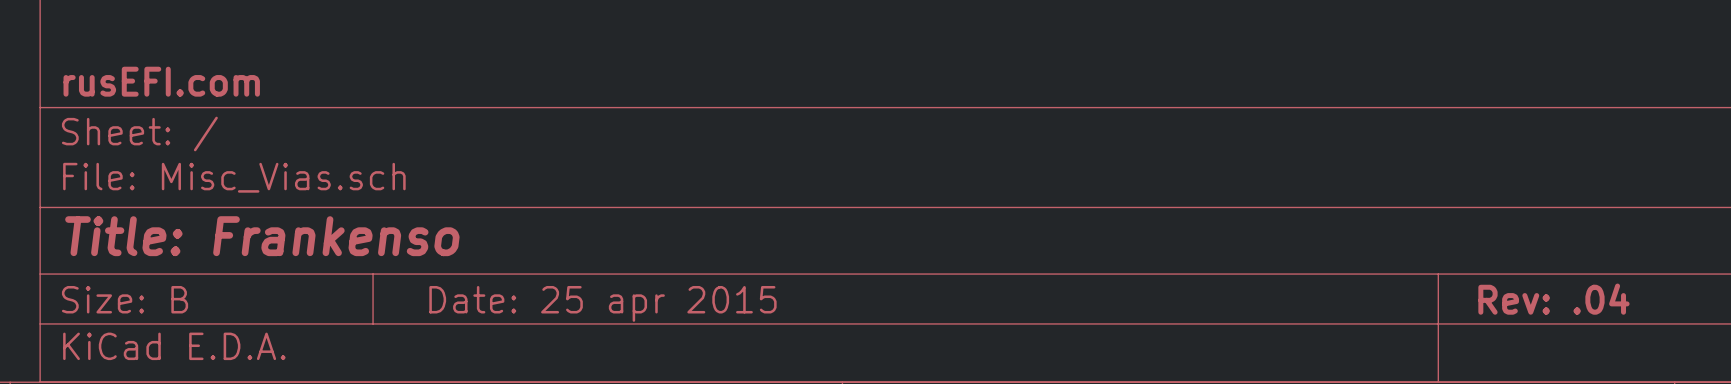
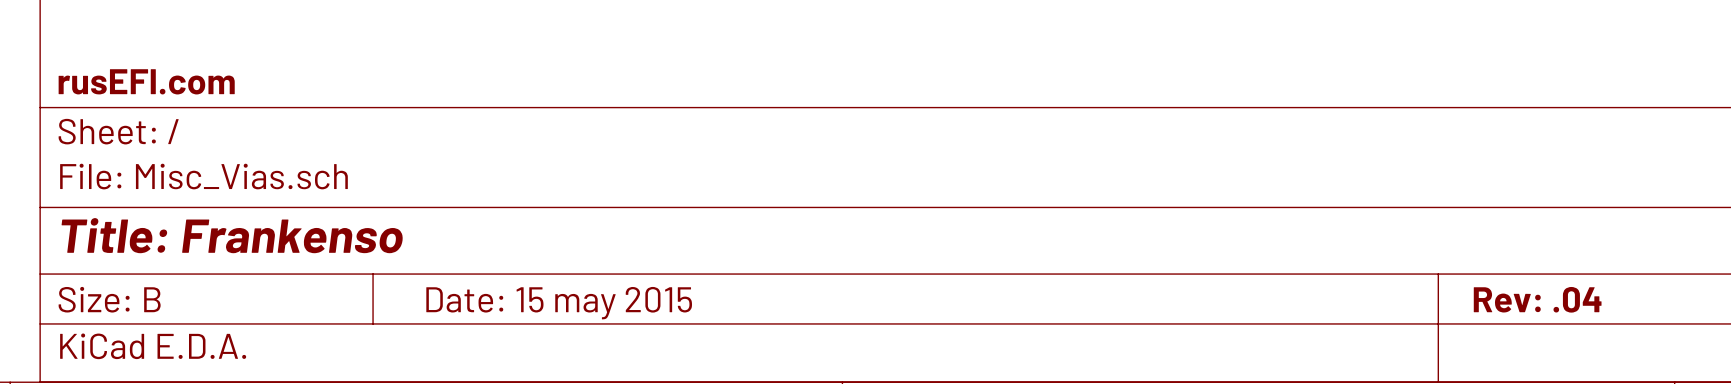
title block: Date: 25 apr 2015 (602, 303) -> Date: 15 may 2015 (559, 303)

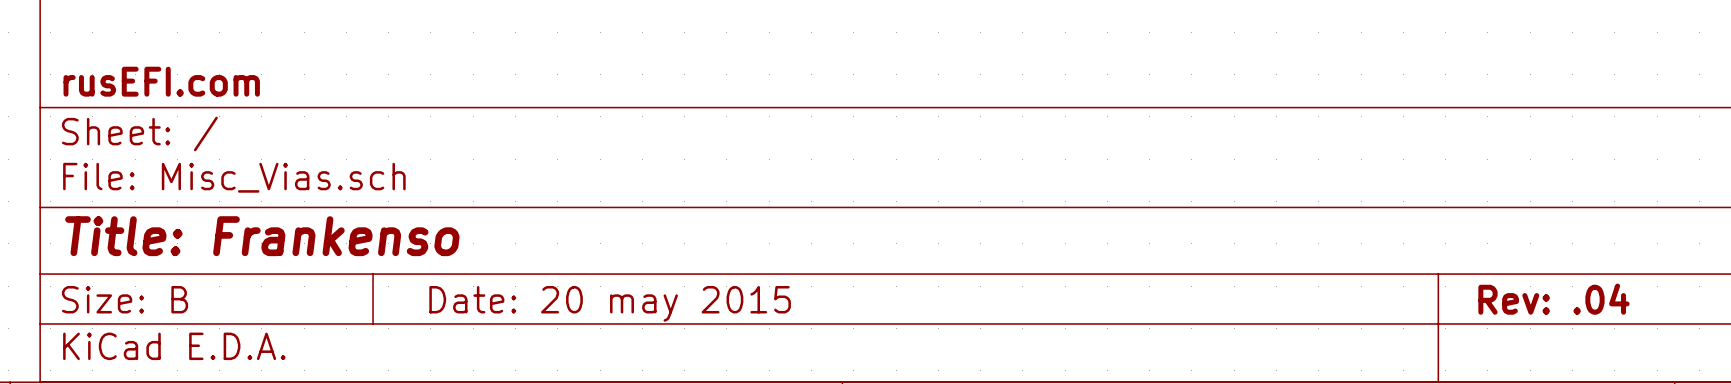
title block: Date: 15 may 2015 (559, 303) -> Date: 20 may 2015 (610, 303)

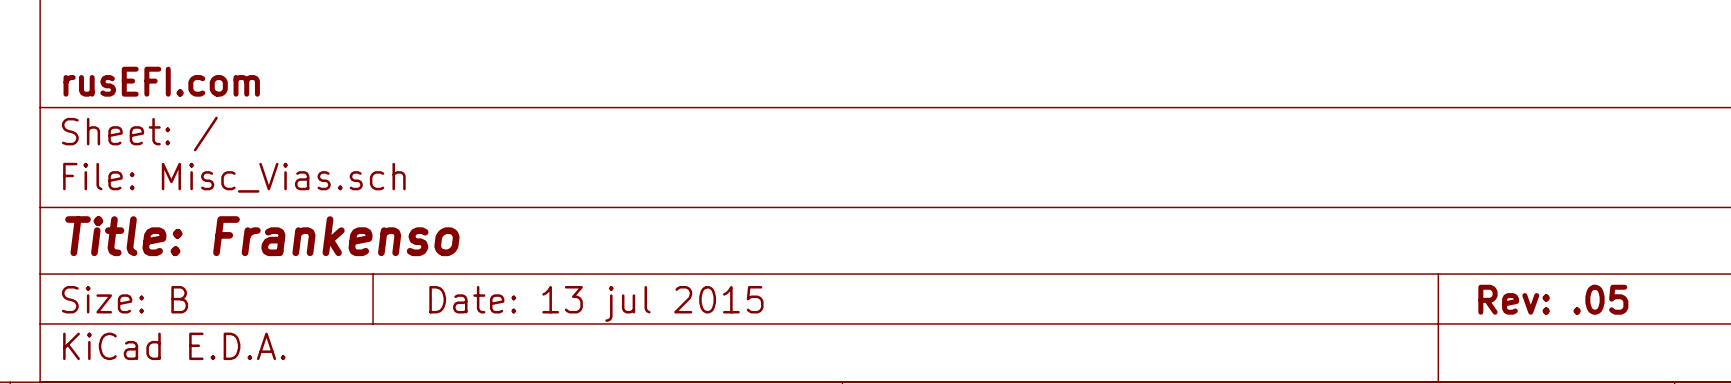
title block: Rev: .04 (1553, 299) -> Rev: .05 (1553, 299)
title block: Date: 20 may 2015 (610, 303) -> Date: 13 jul 2015 (596, 303)

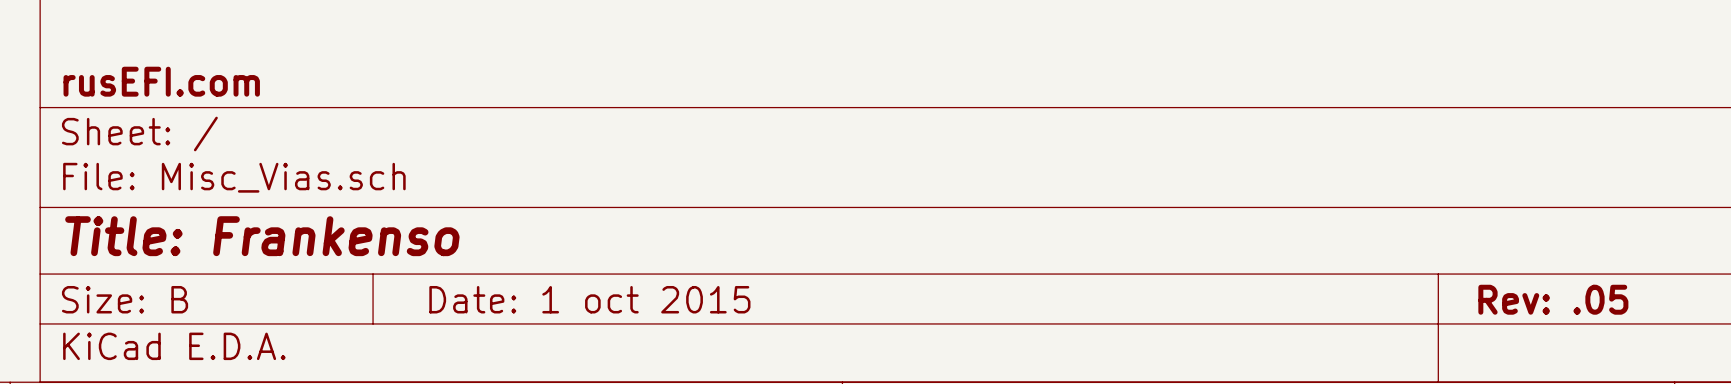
title block: Date: 13 jul 2015 (596, 303) -> Date: 1 oct 2015 (589, 299)

